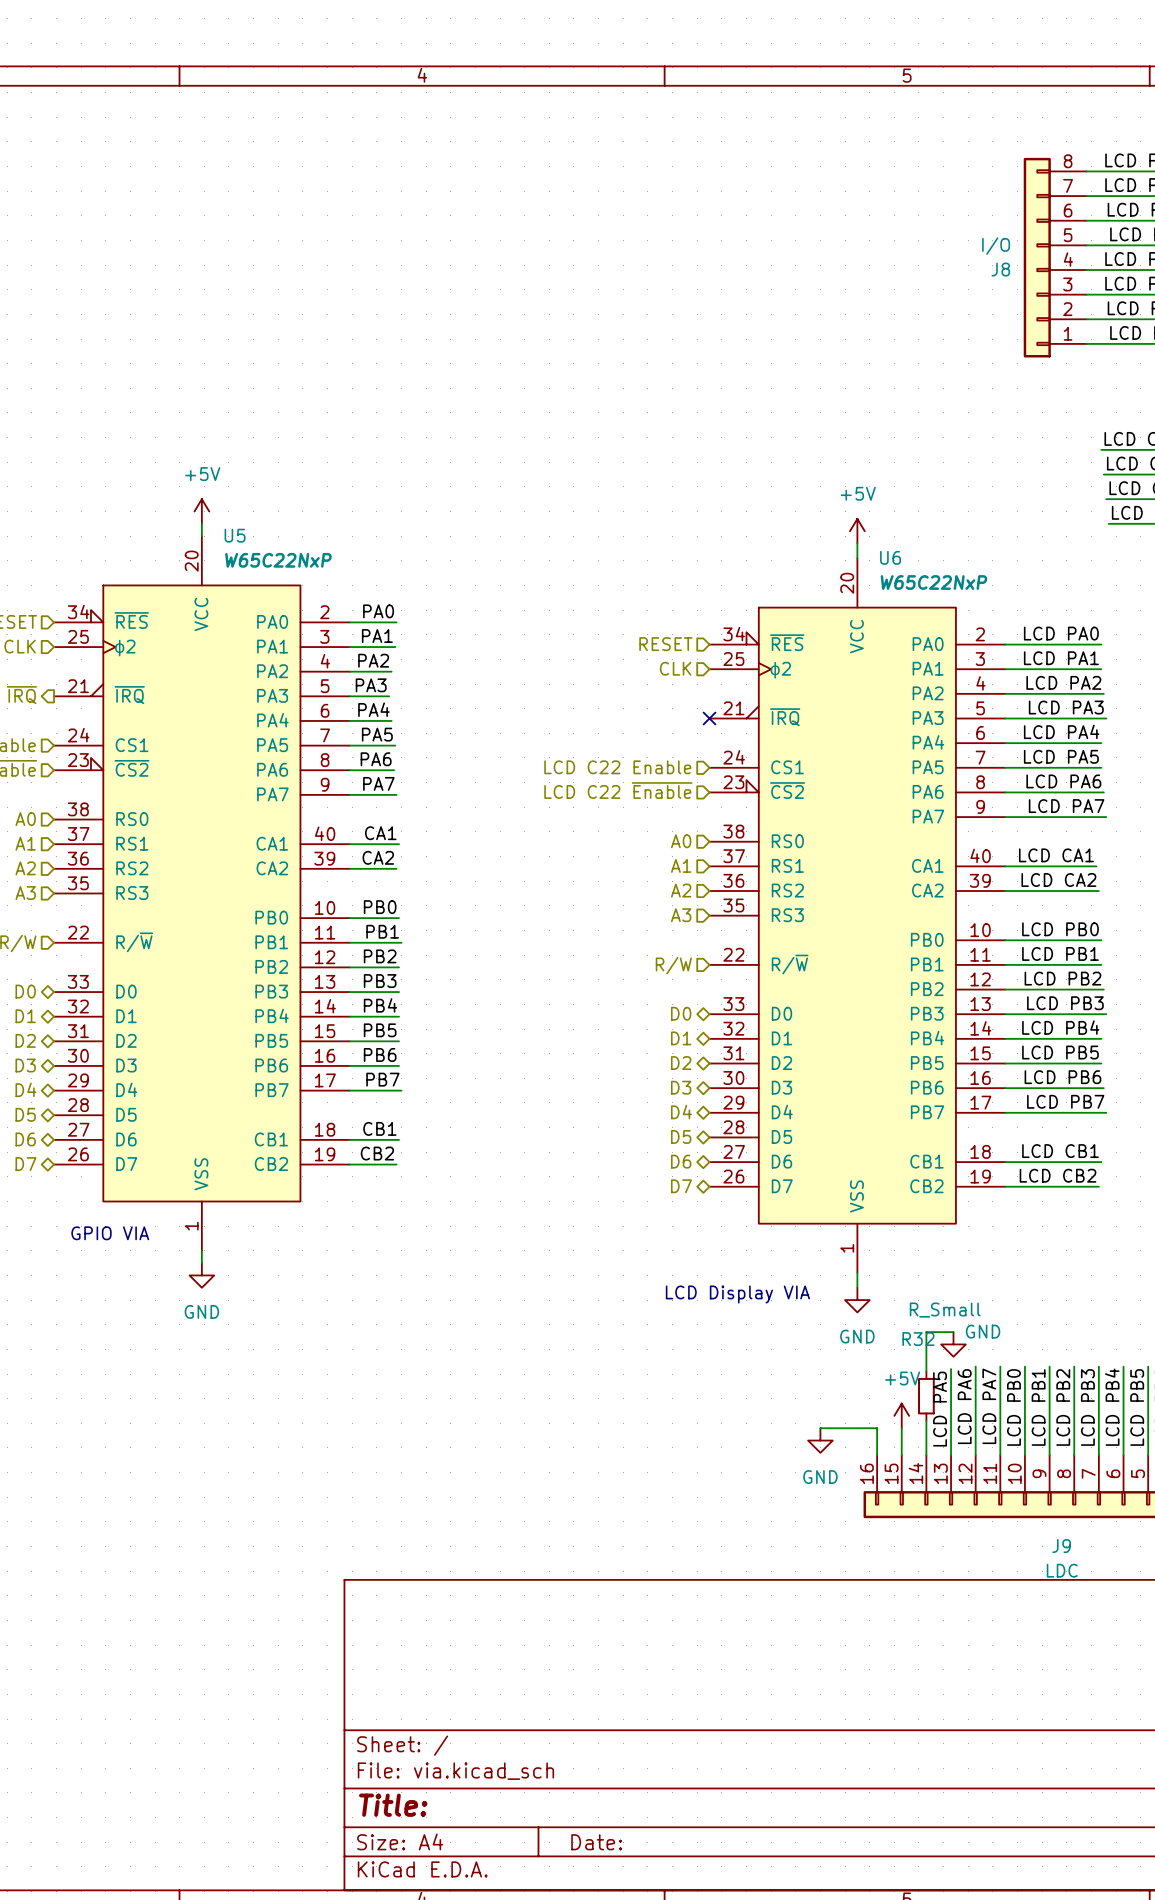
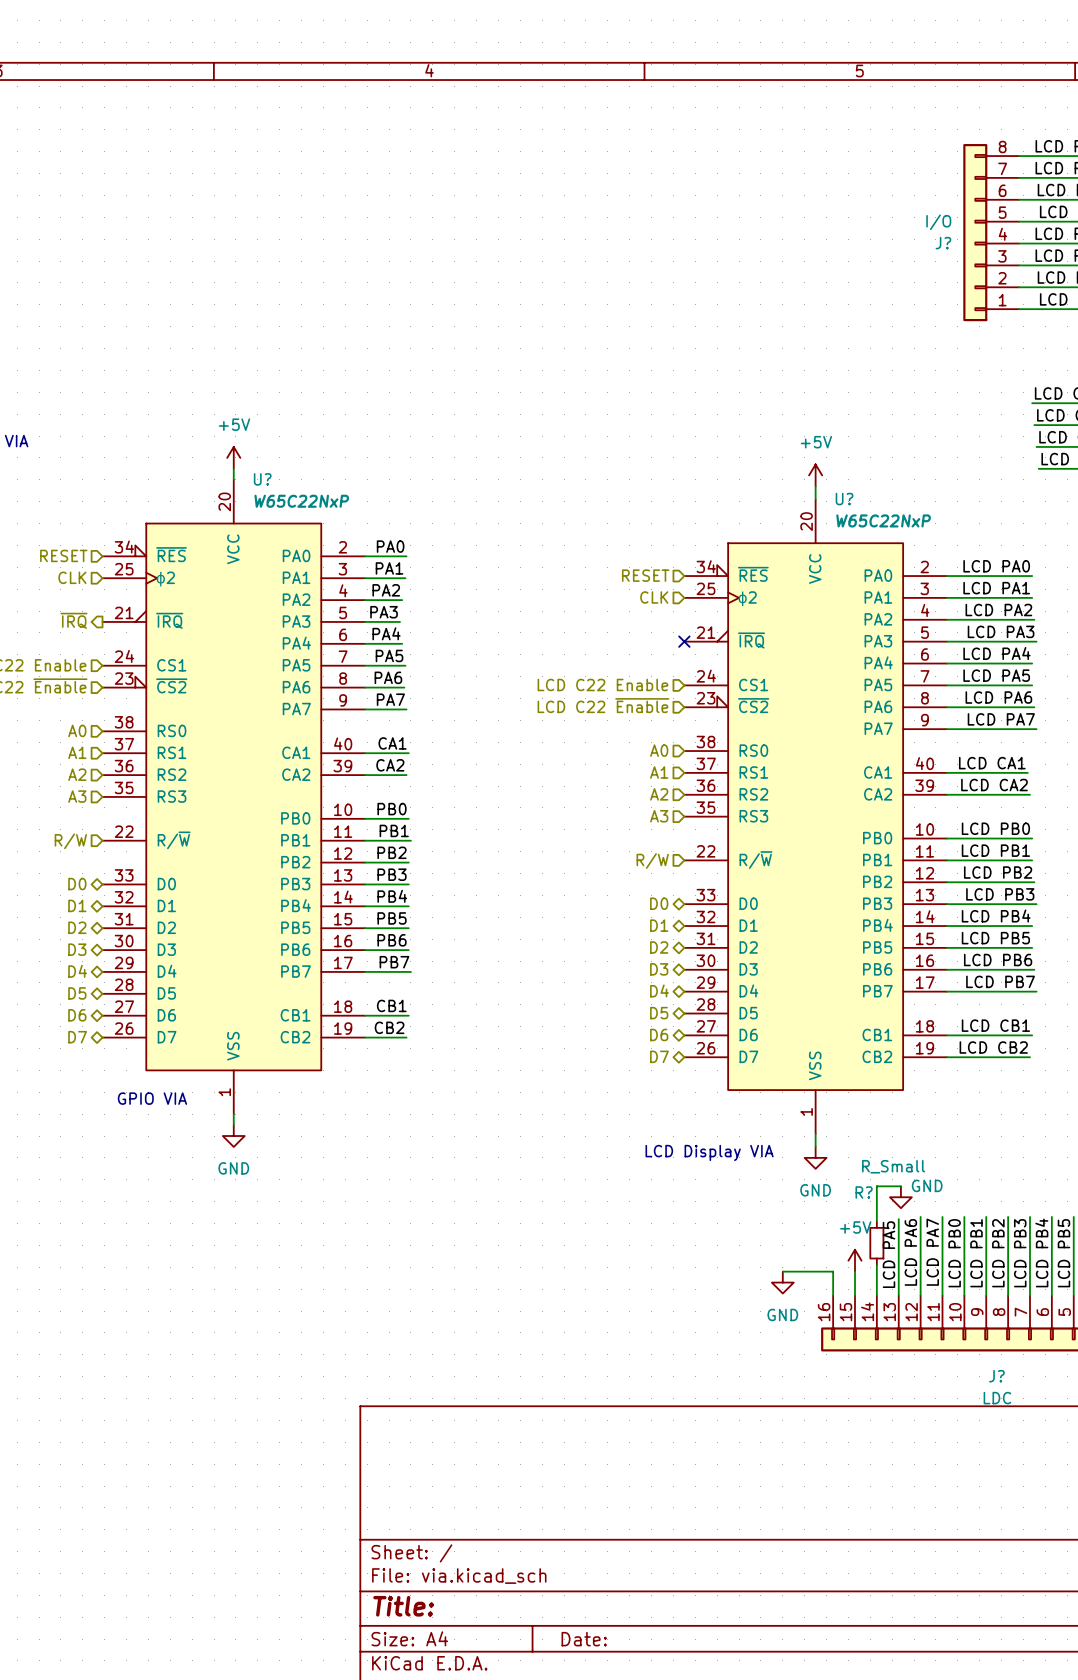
J8 name: J8 (1000, 269) -> J? (943, 243)
U5 name: U5 (235, 535) -> U? (262, 479)
U6 name: U6 (890, 557) -> U? (844, 499)
R32 name: R32 (918, 1339) -> R? (864, 1192)
J9 name: J9 (1061, 1546) -> J? (996, 1376)

